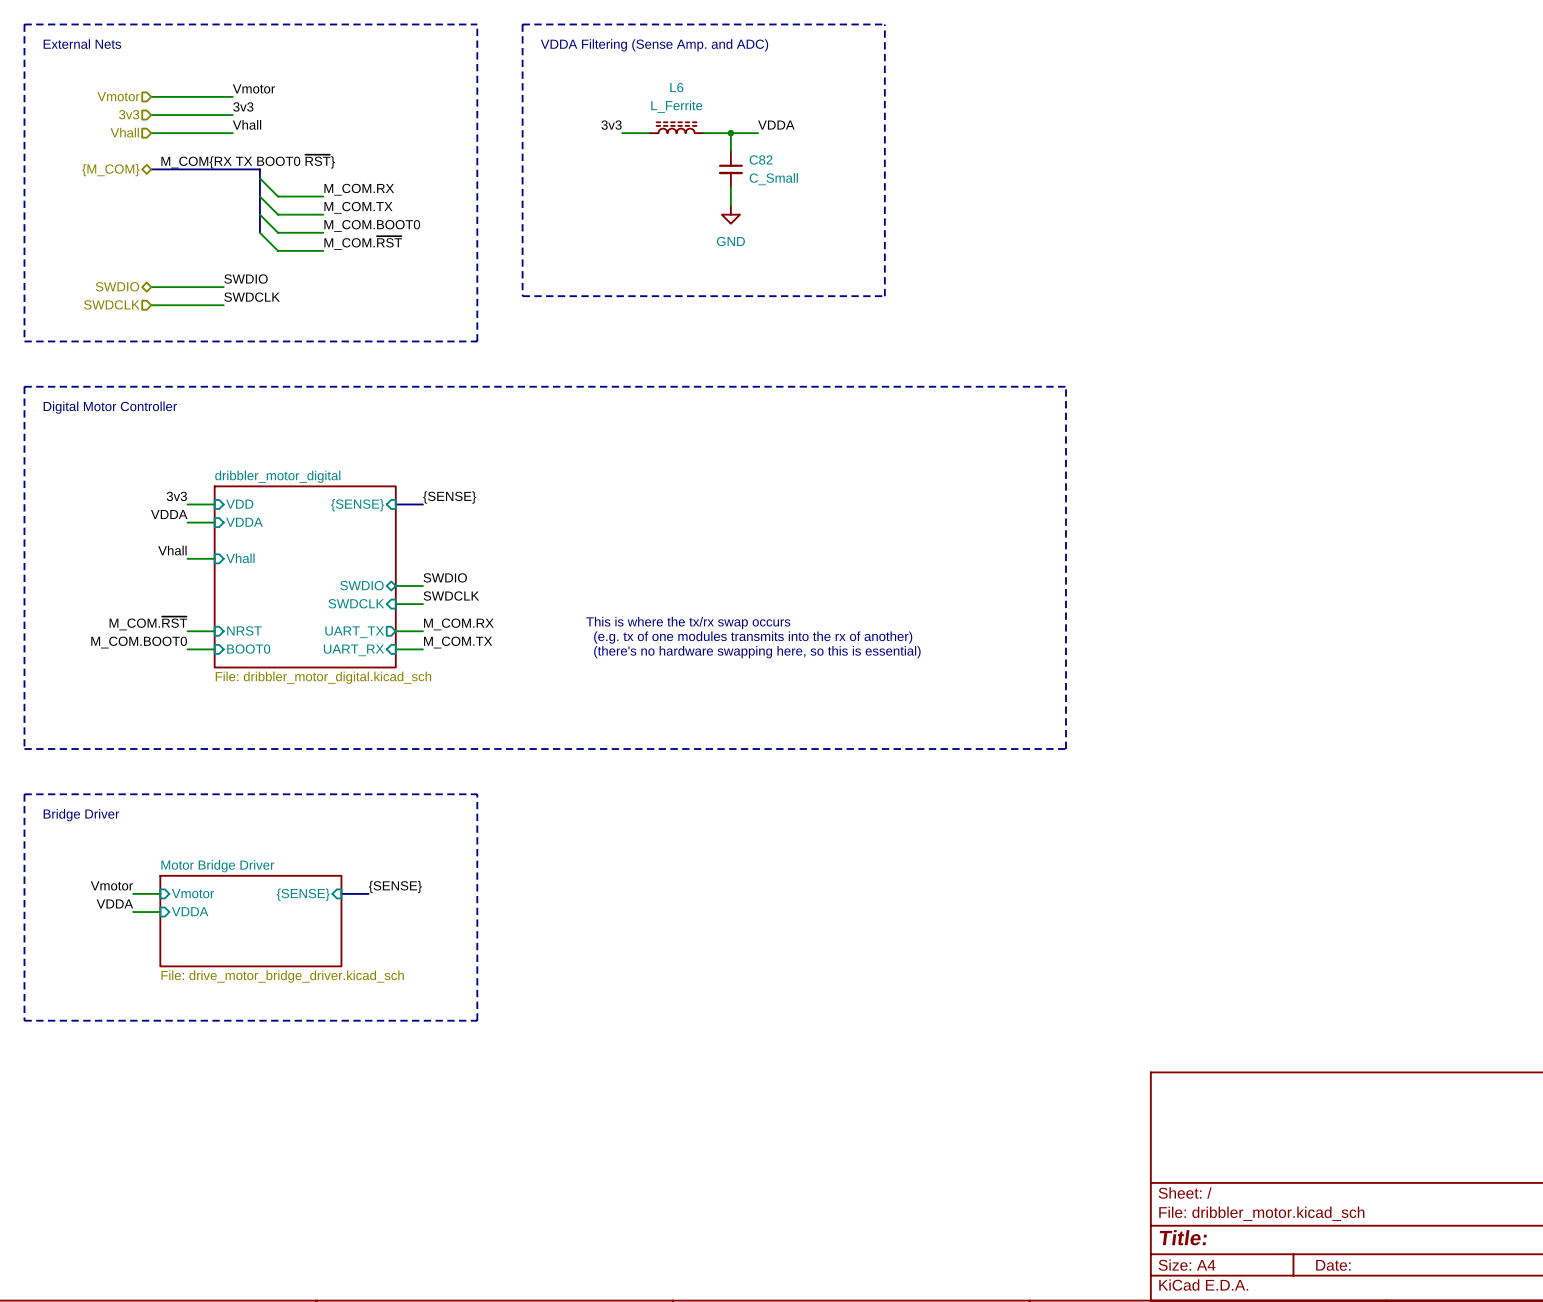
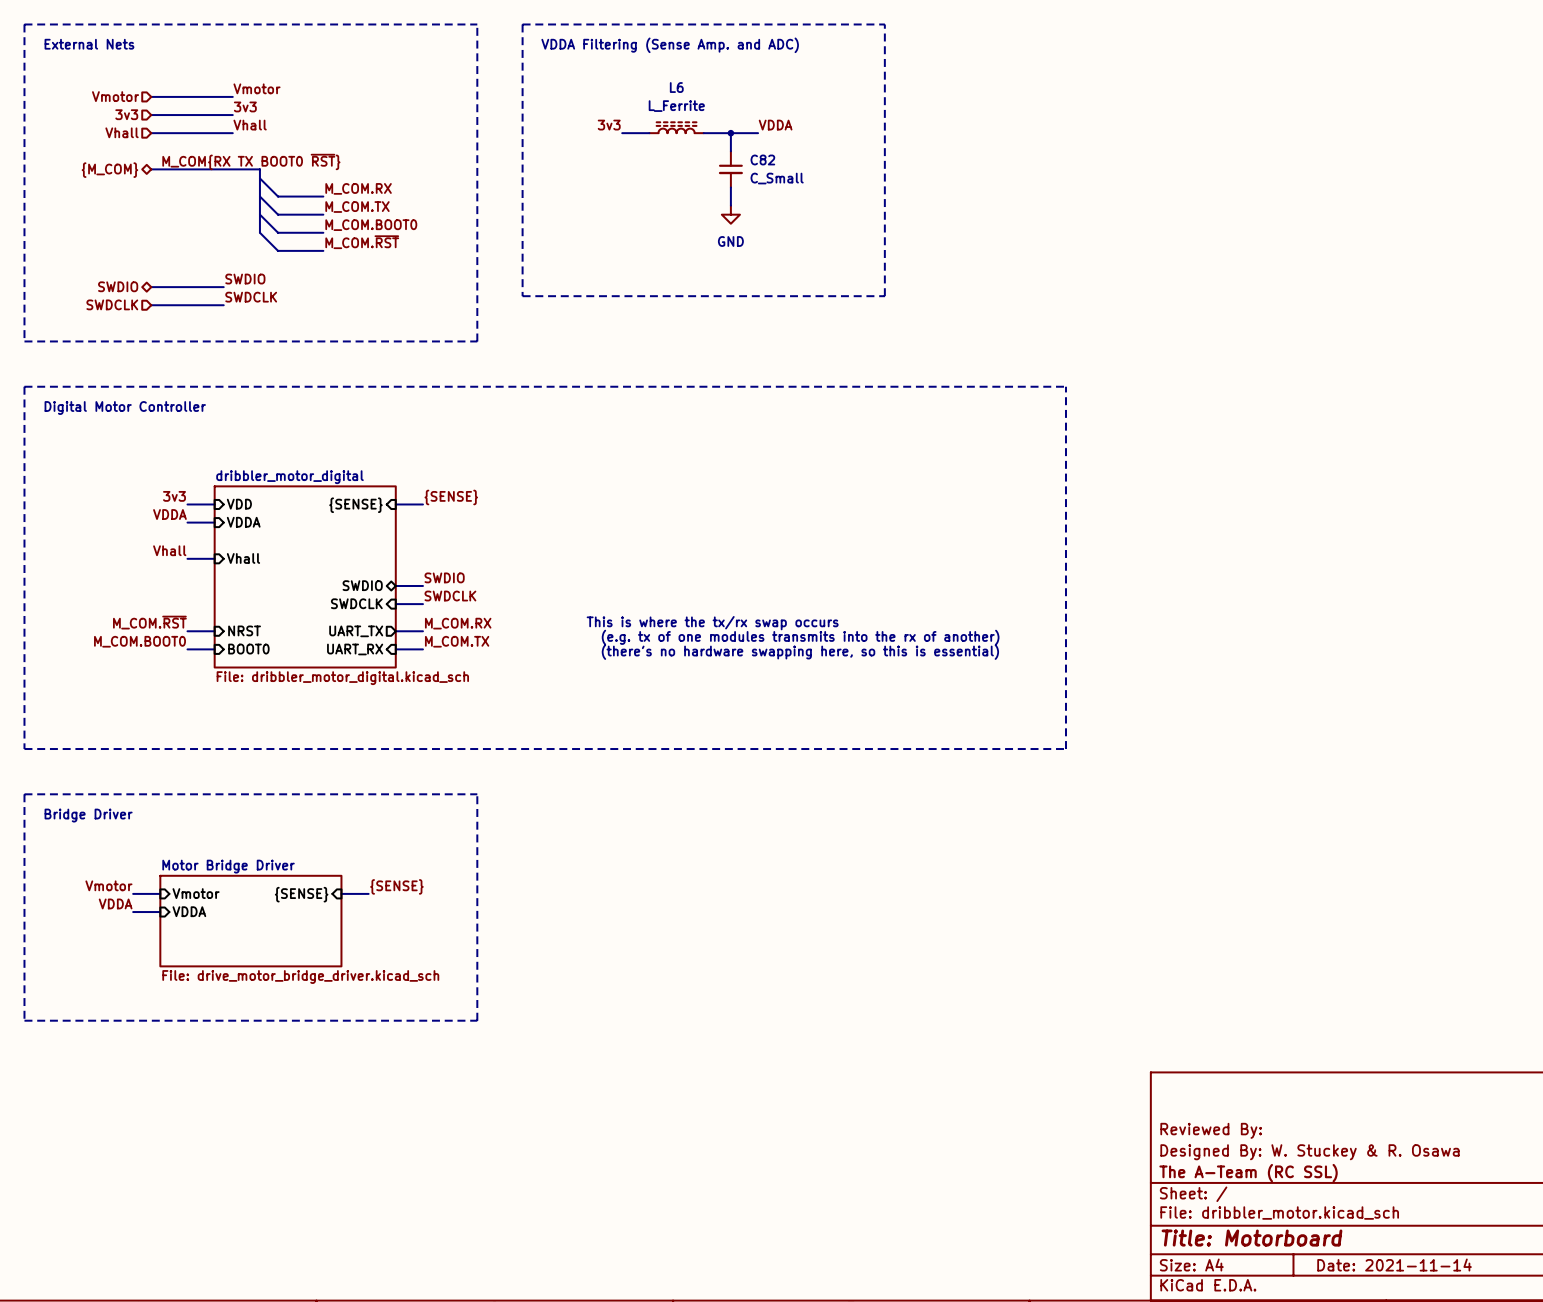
title block: none -> Reviewed By: (1211, 1130)
title block: none -> Designed By: W. Stuckey & R. Osawa (1309, 1152)
title block: none -> The A-Team (RC SSL) (1248, 1173)
title block: Title: (1183, 1237) -> Title: Motorboard (1251, 1238)
title block: Date: (1333, 1265) -> Date: 2021-11-14 (1394, 1265)

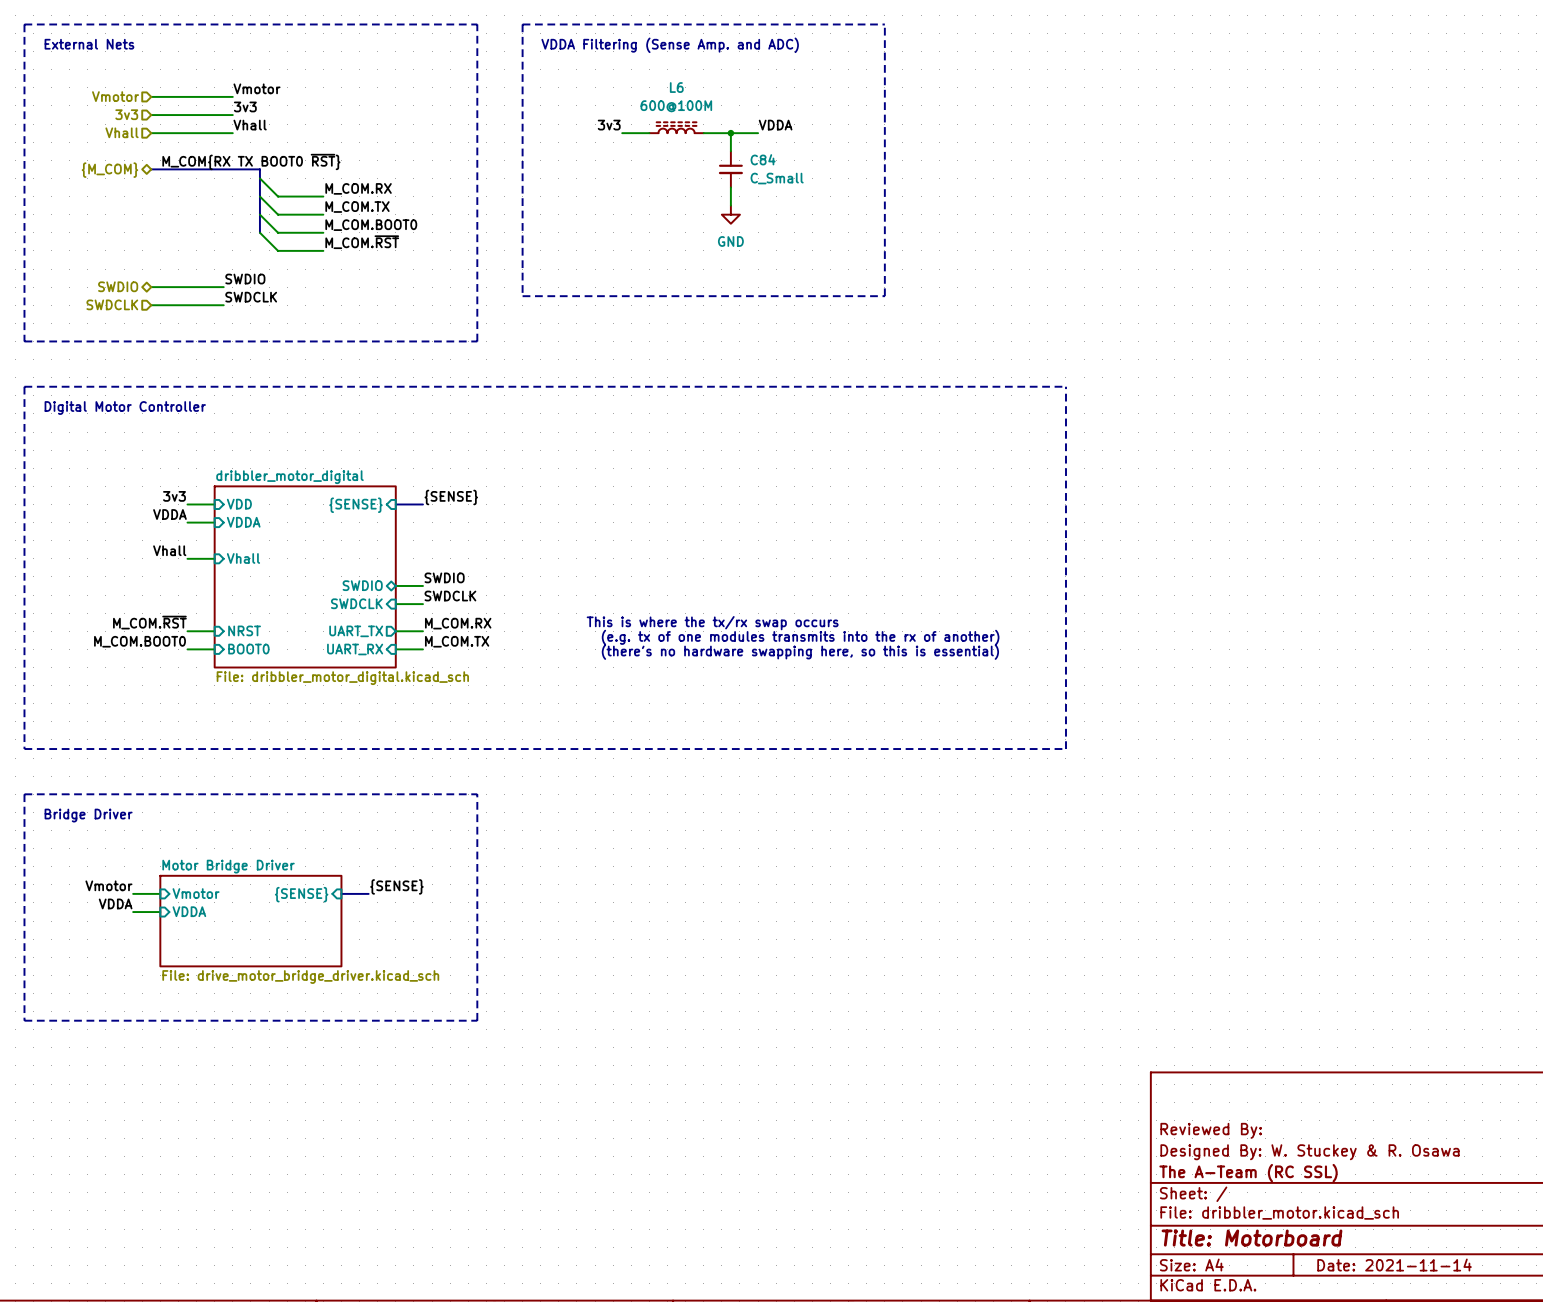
L6 value: L_Ferrite (676, 106) -> 600@100M (676, 106)
C82 name: C82 (762, 159) -> C84 (763, 159)

